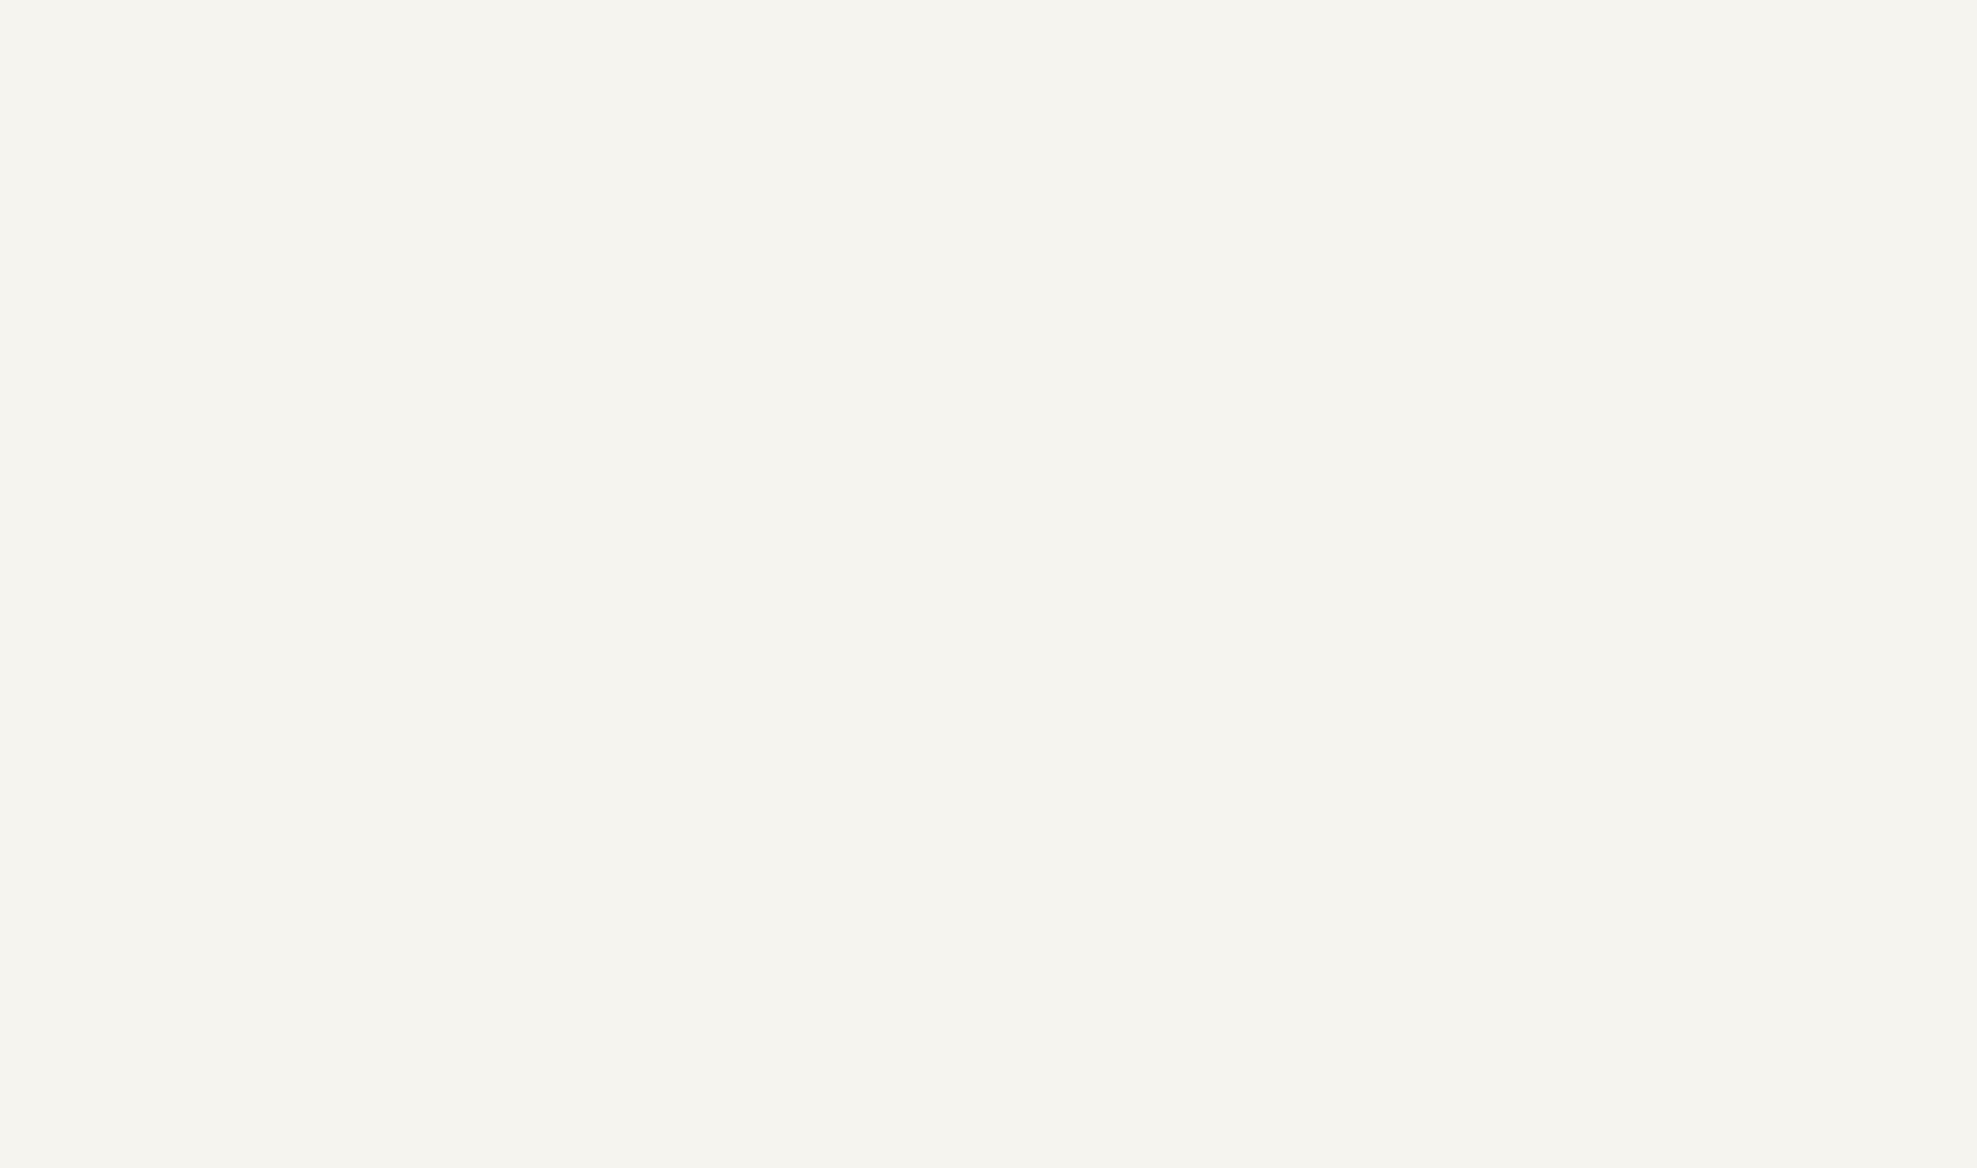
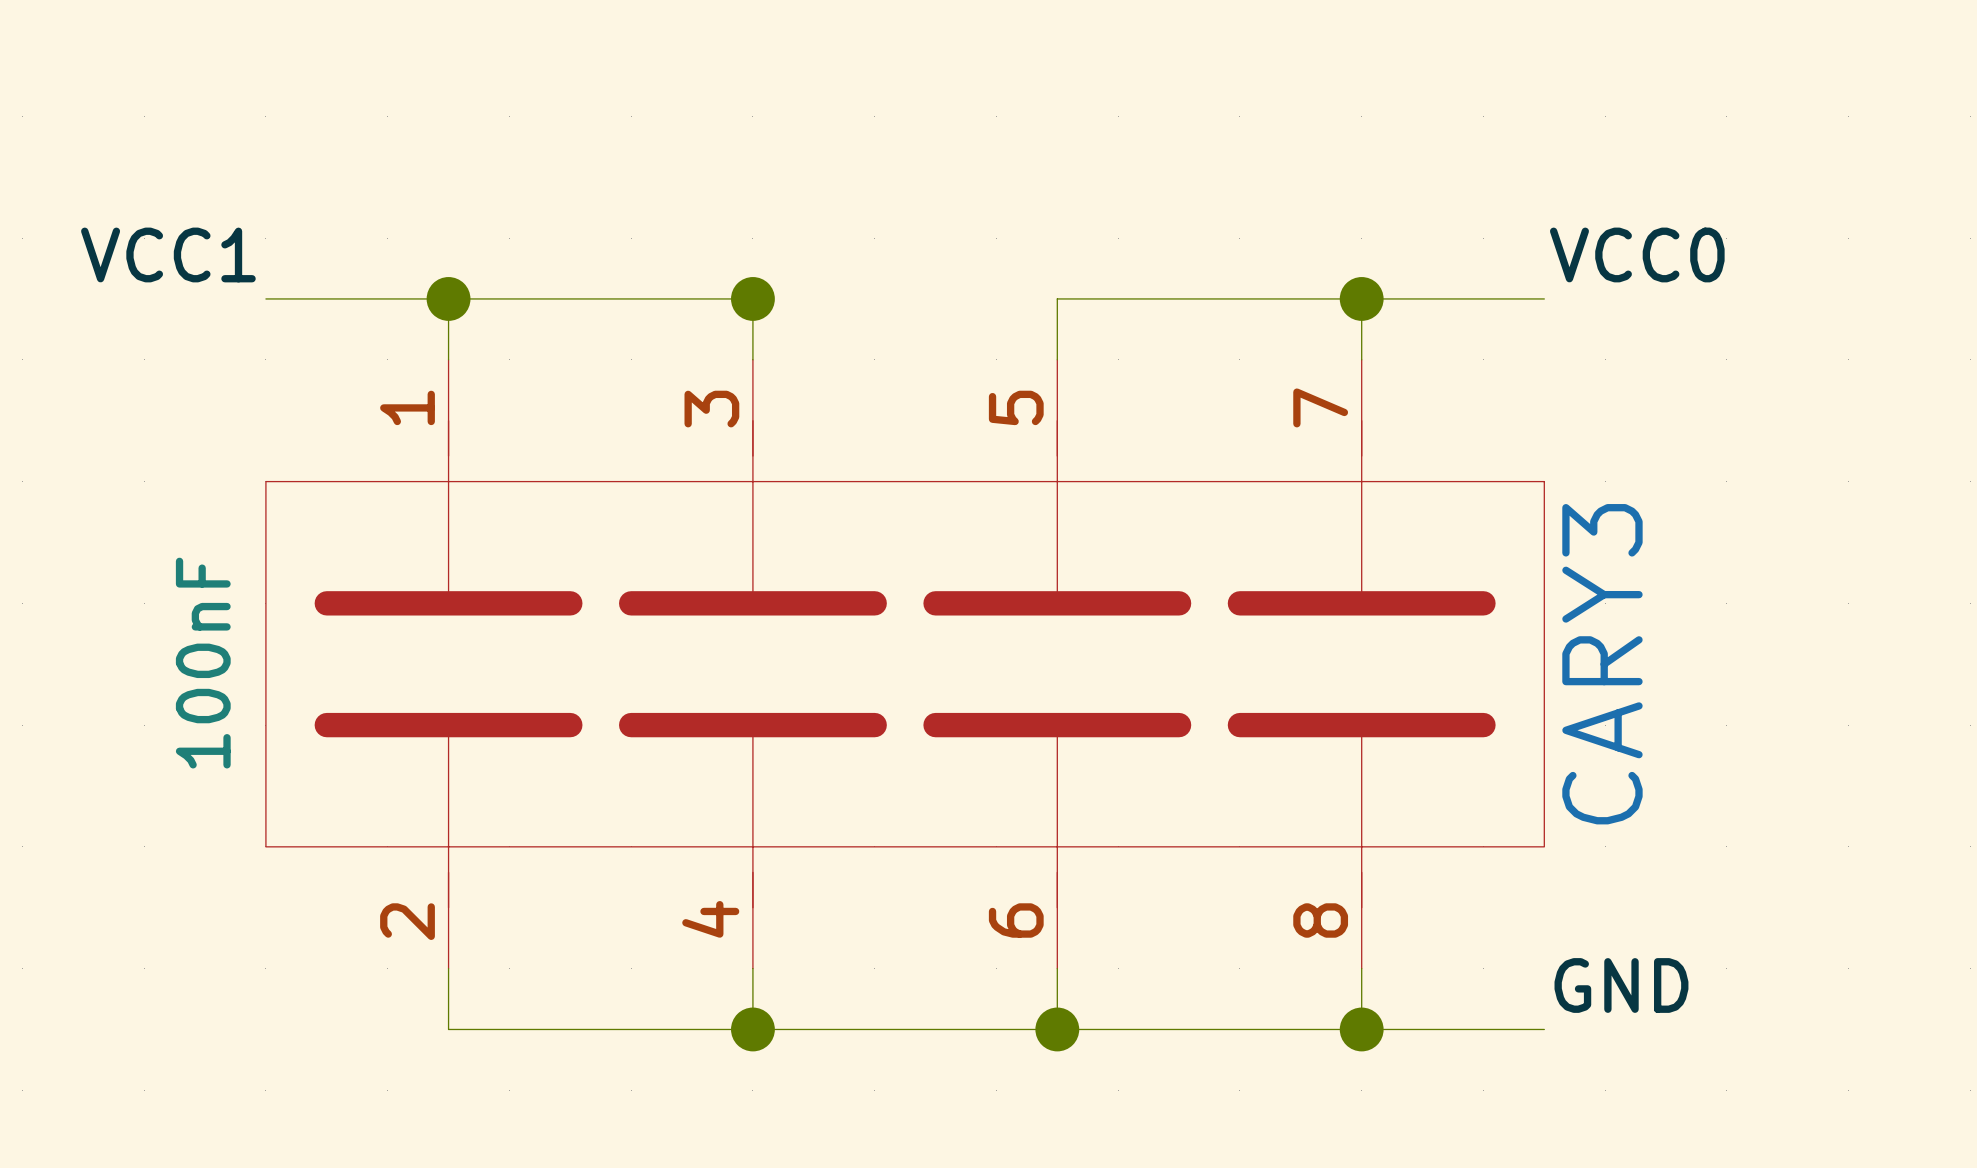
label: none -> VCC1 (168, 254)
label: none -> VCC0 (1637, 254)
wire: none -> (265, 298) (752, 298) (752, 359)
wire: none -> (448, 298) (448, 359)
junction: none -> (448, 298)
junction: none -> (752, 298)
wire: none -> (1361, 298) (1361, 359)
junction: none -> (1361, 298)
wire: none -> (1544, 298) (1057, 298) (1057, 359)
CARY3: none -> 100nF (905, 664)
wire: none -> (448, 968) (448, 1029) (1544, 1029)
wire: none -> (752, 968) (752, 1029)
wire: none -> (1057, 968) (1057, 1029)
wire: none -> (1361, 968) (1361, 1029)
label: none -> GND (1621, 985)
junction: none -> (752, 1029)
junction: none -> (1057, 1029)
junction: none -> (1361, 1029)

